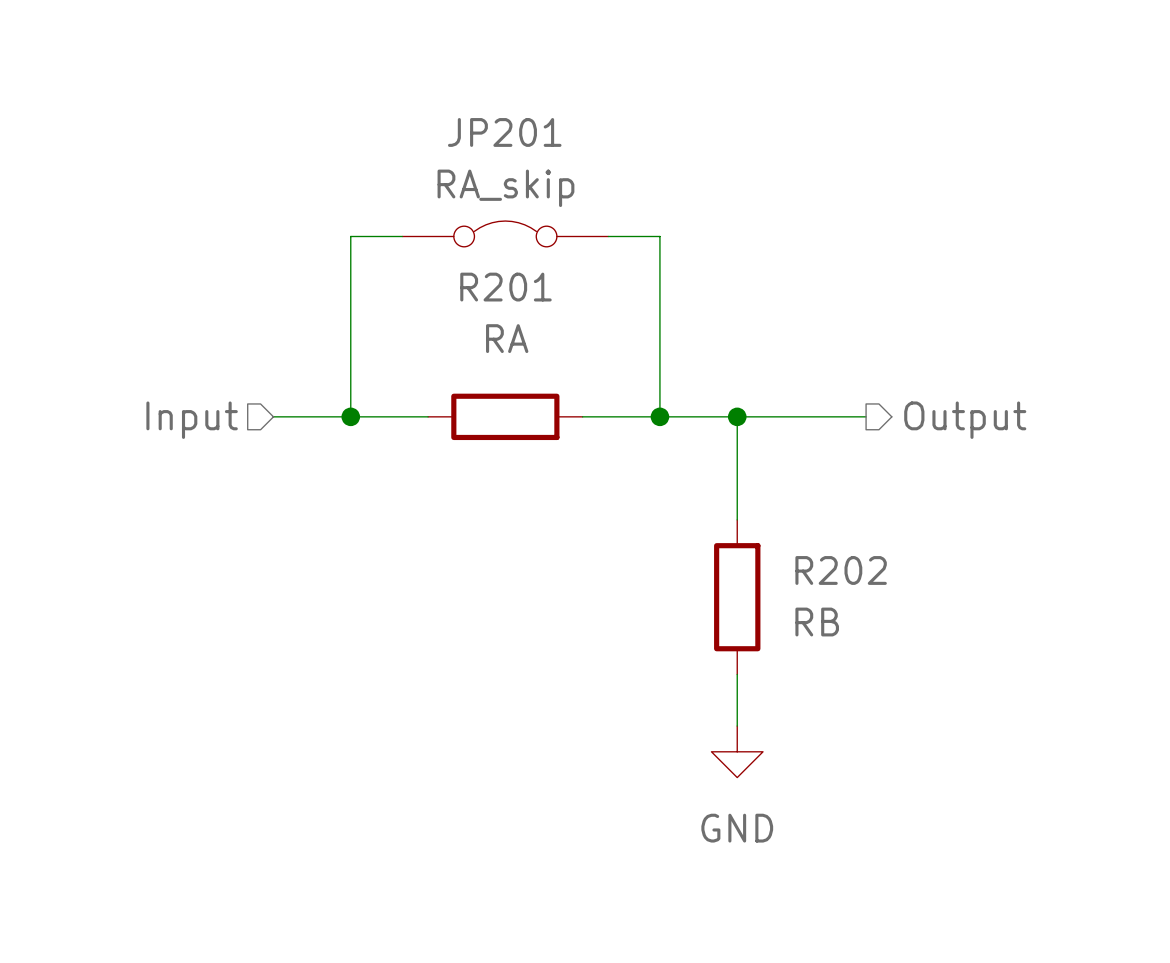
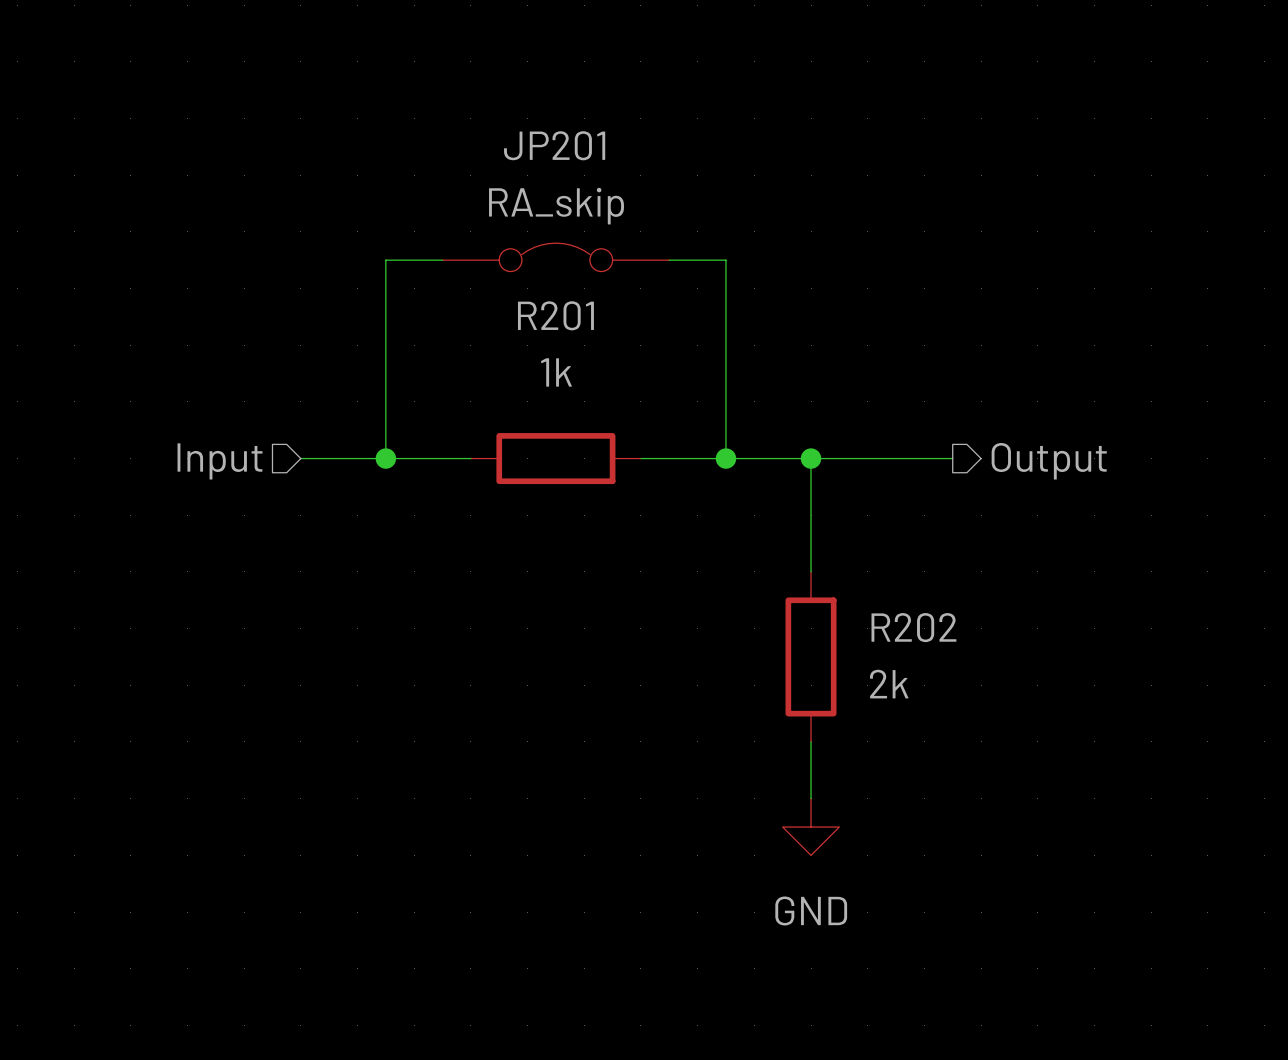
R201 value: RA (507, 338) -> 1k (556, 372)
R202 value: RB (817, 622) -> 2k (889, 684)

